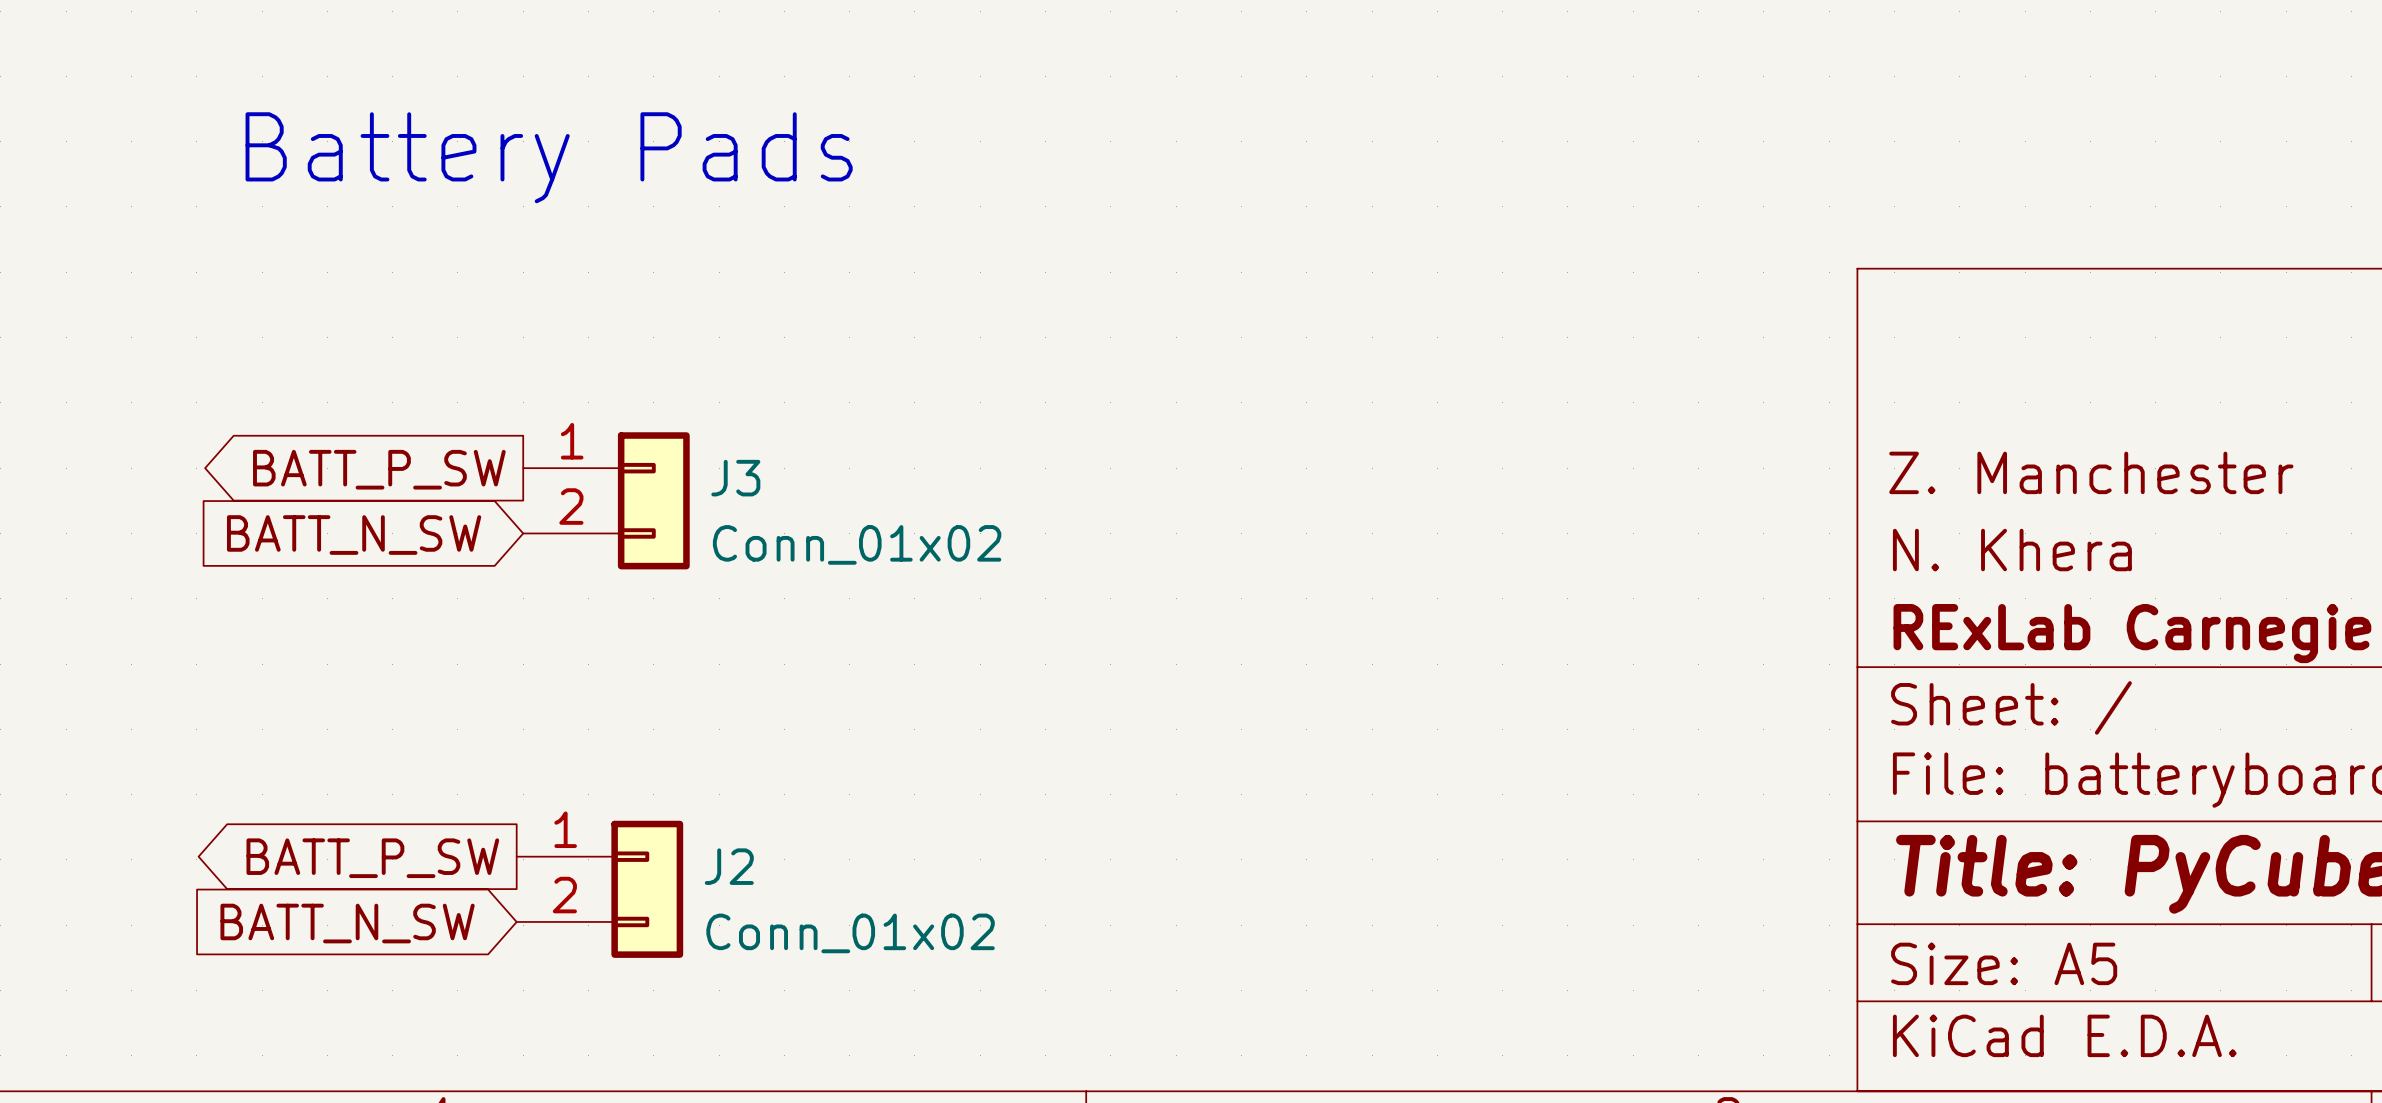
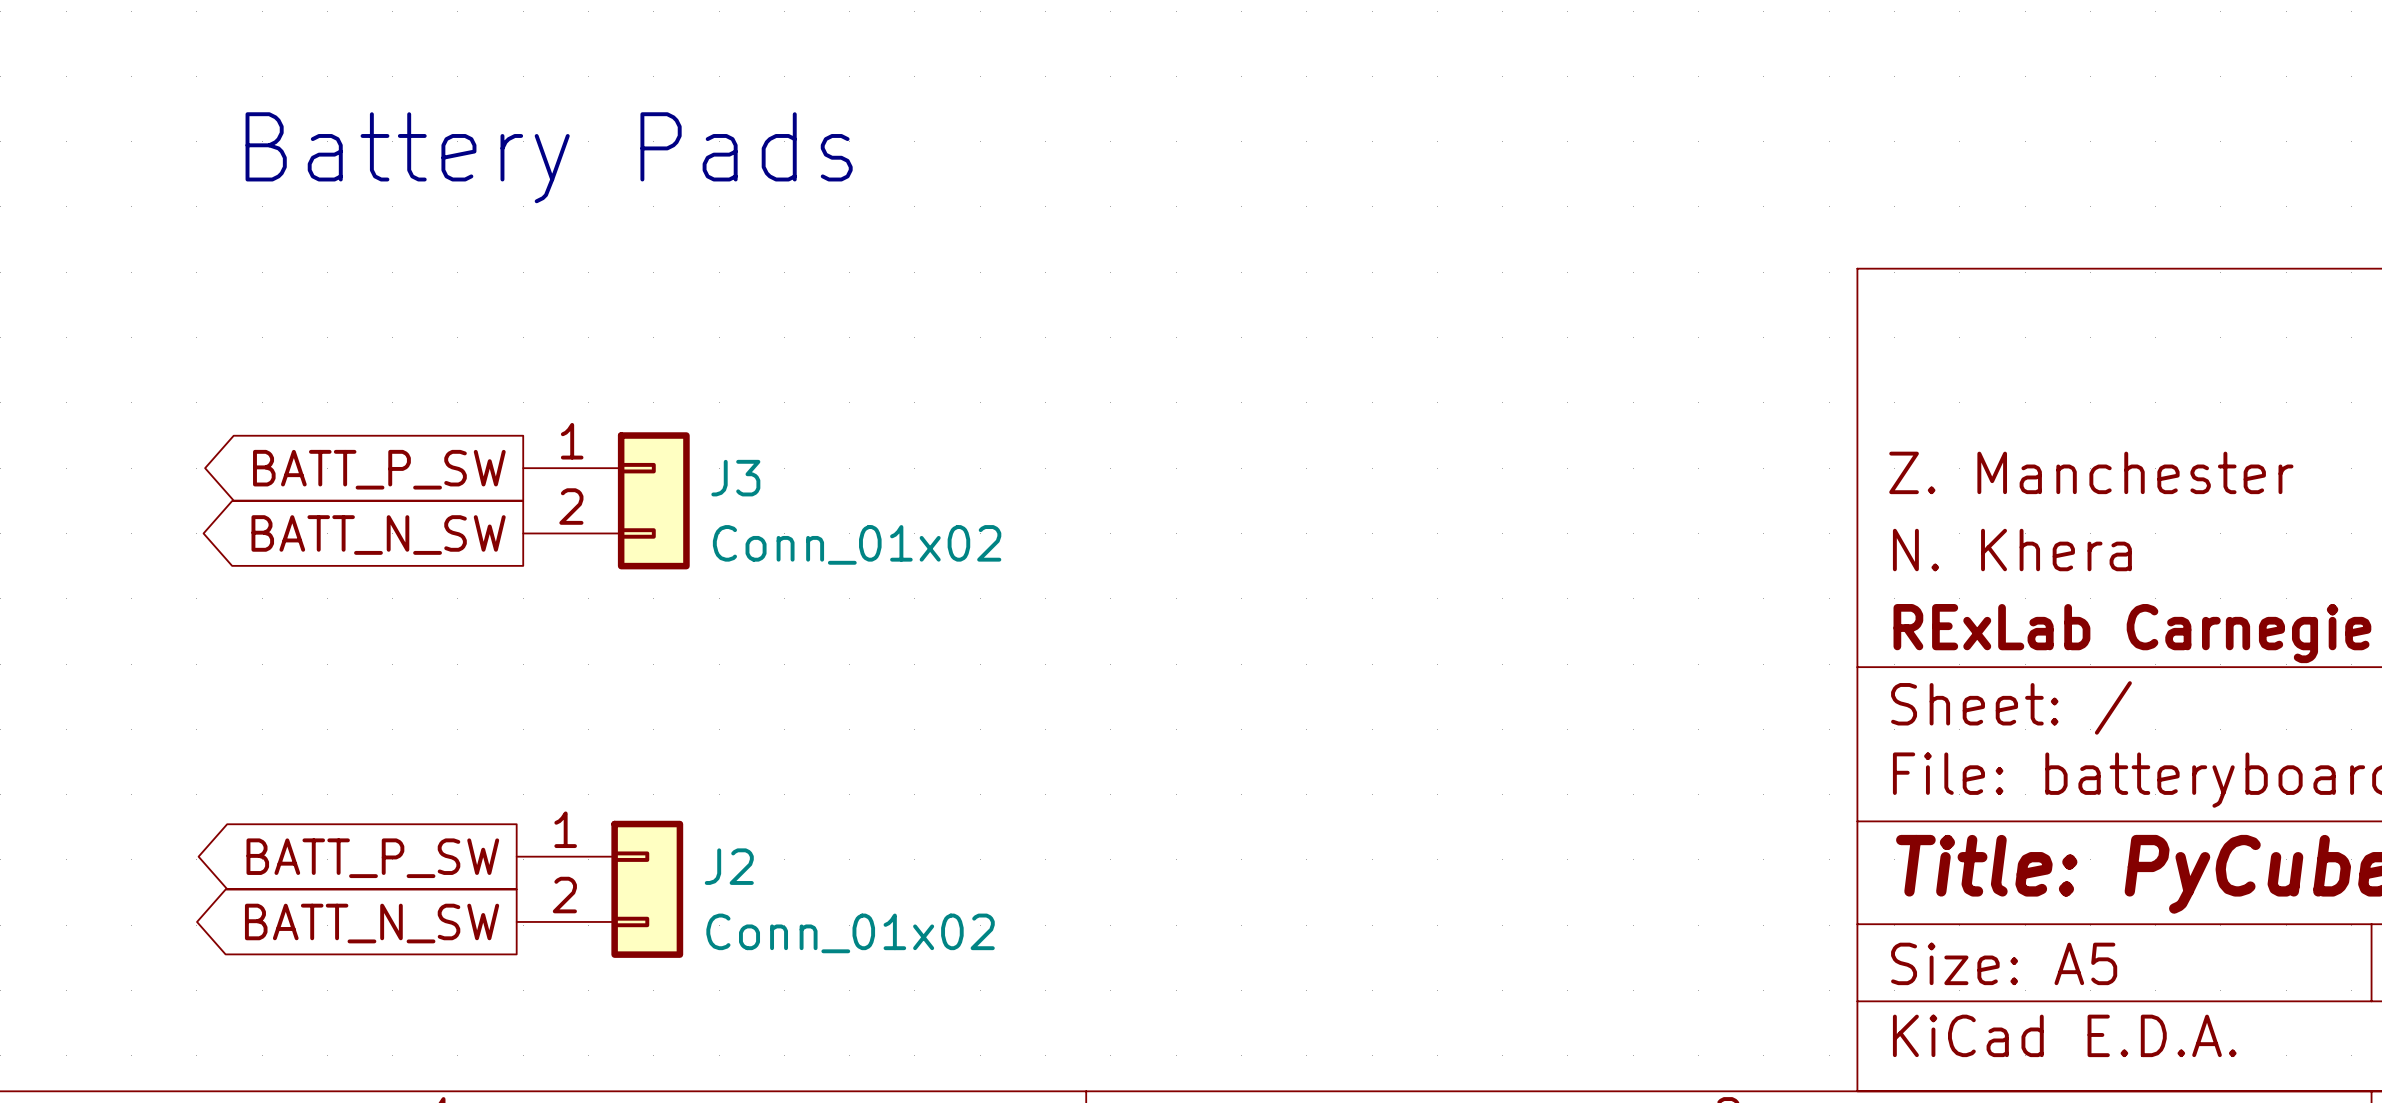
global label shape: input (354, 535) -> output (378, 535)
global label shape: input (347, 923) -> output (372, 923)

